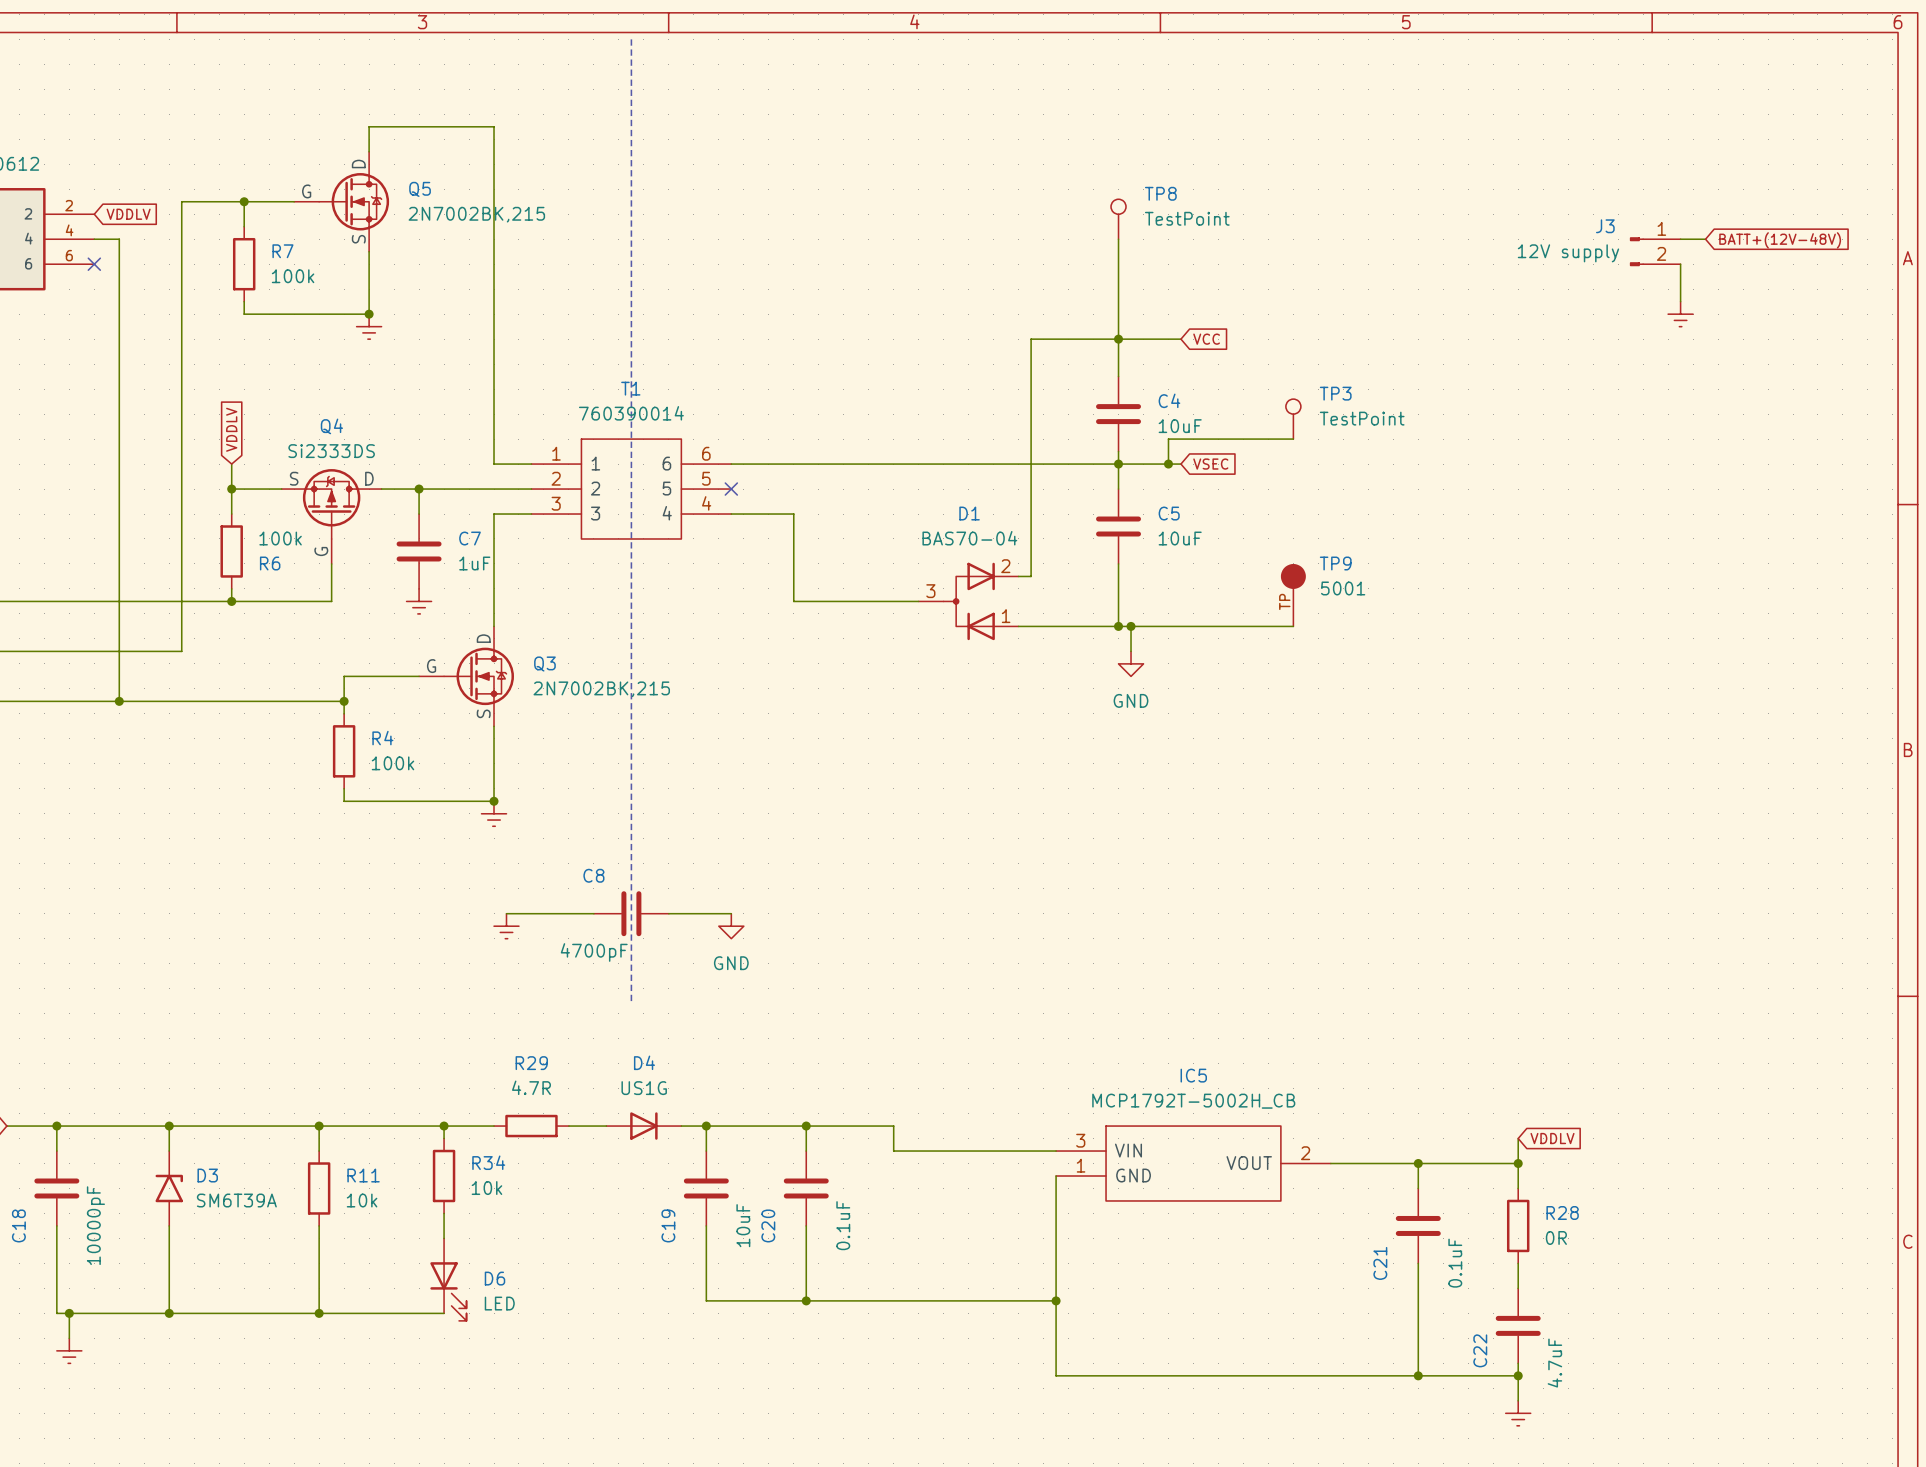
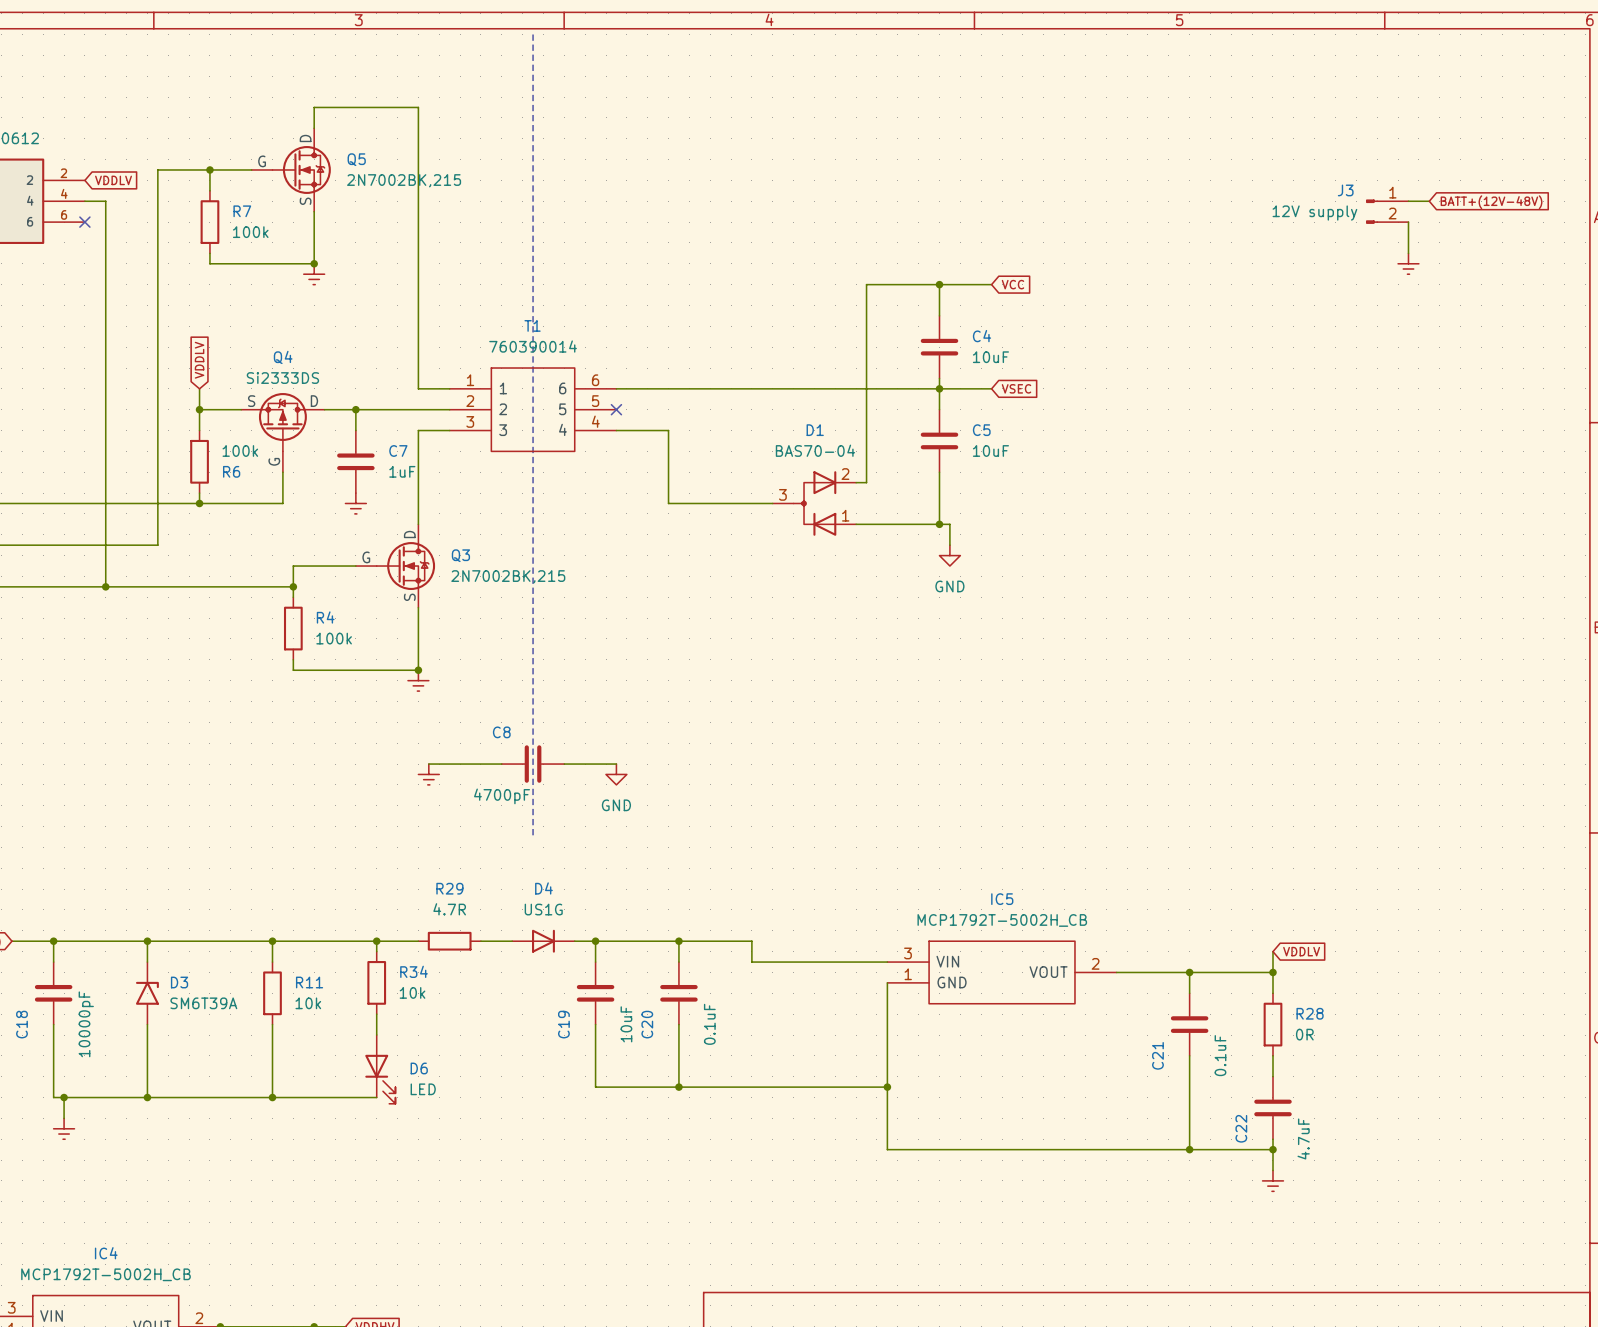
TP8: TestPoint (1118, 219) -> none
wire: (1118, 239) (1118, 339) -> none
TP3: TestPoint (1293, 419) -> none
wire: (1293, 439) (1168, 439) (1168, 464) -> none
junction: (1168, 464) -> none
TP9: 5001 (1293, 595) -> none
wire: (1131, 626) (1293, 626) -> none
junction: (1131, 626) -> none

